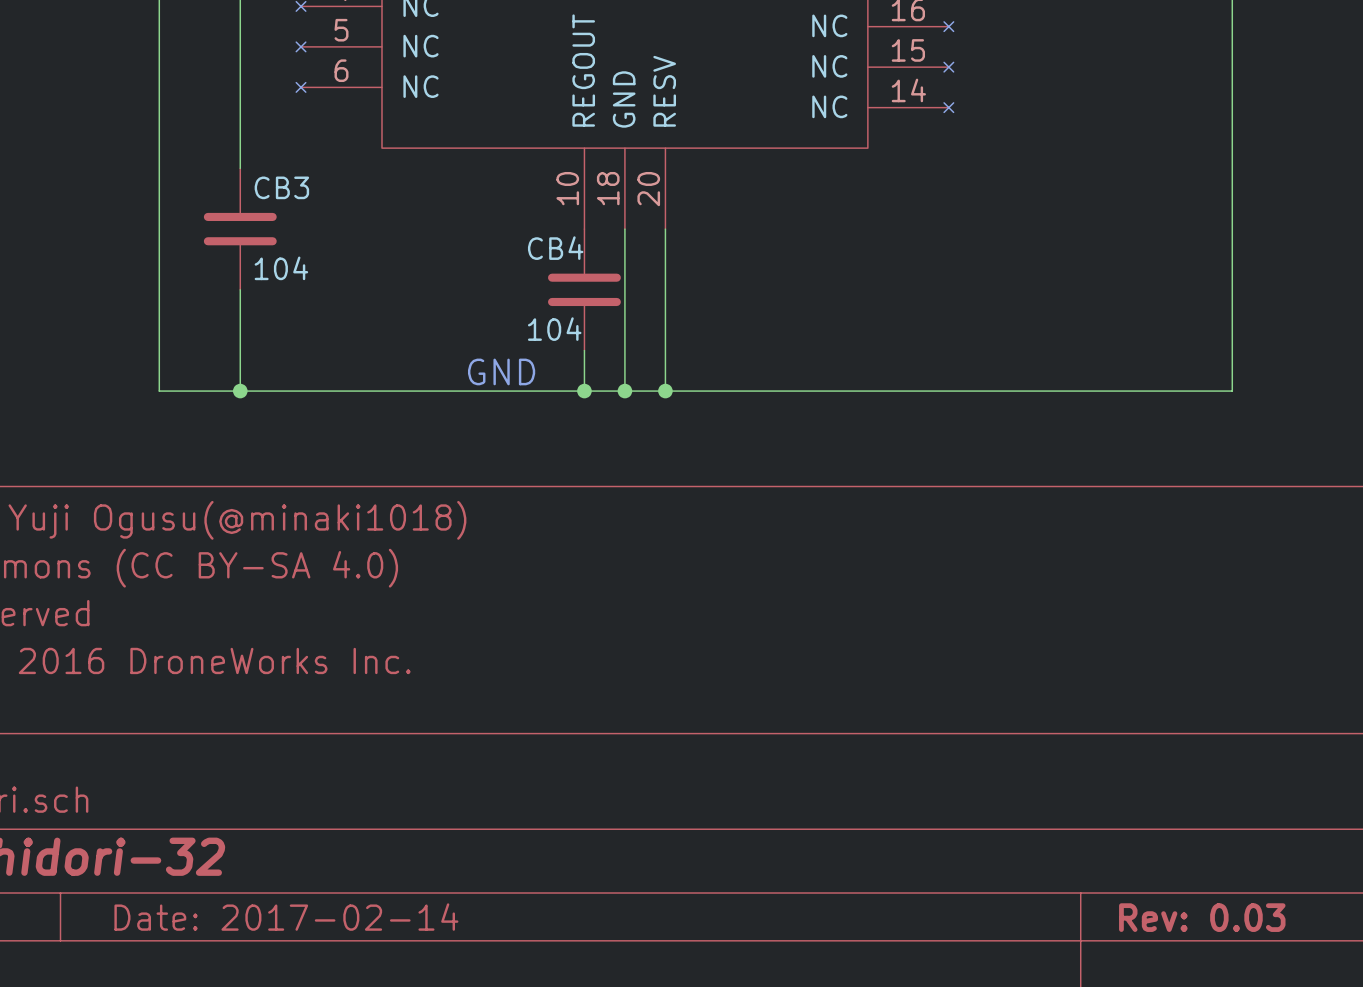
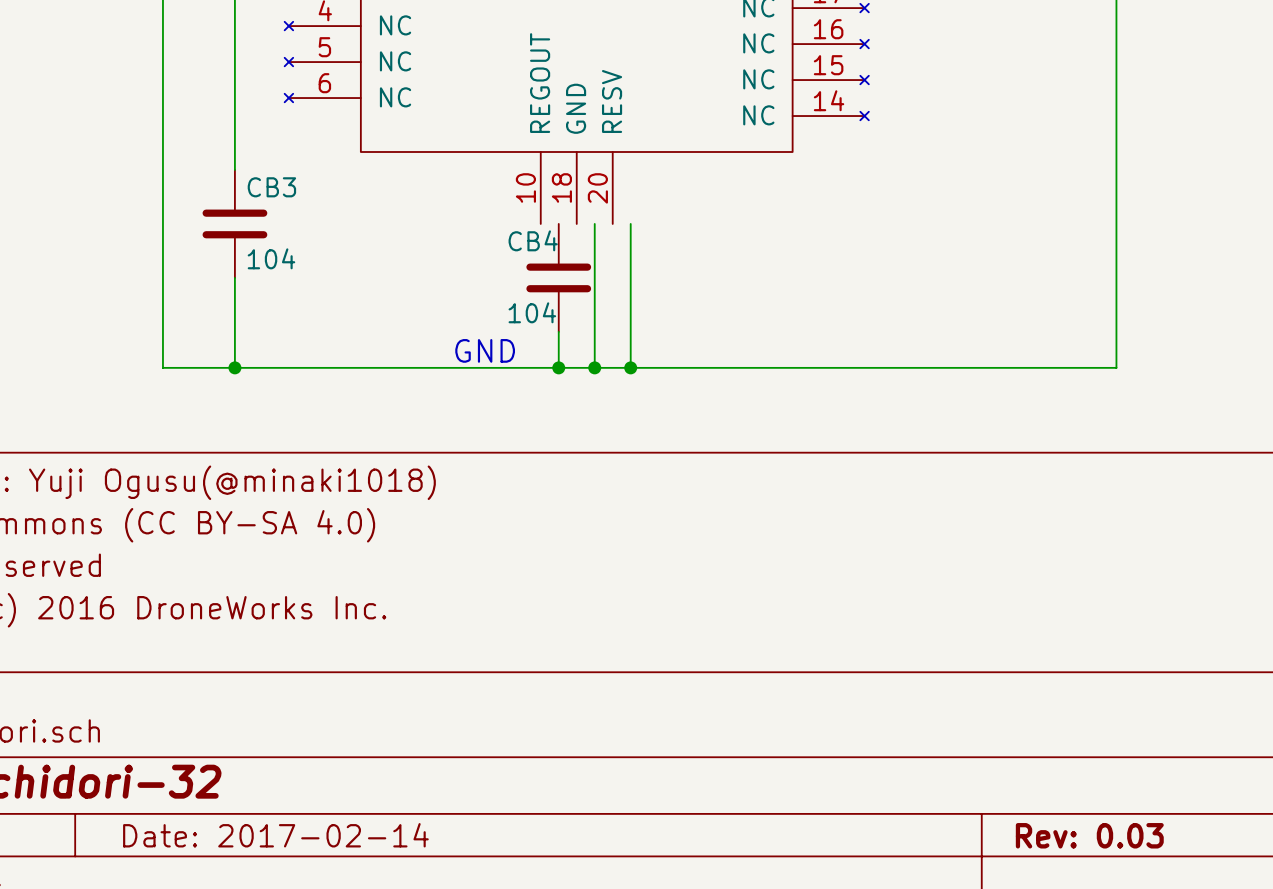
wire: (624, 229) (624, 391) -> (594, 223) (594, 367)
wire: (665, 229) (665, 391) -> (630, 223) (630, 367)
CB4 position: (584, 289) -> (558, 277)
wire: (584, 350) (584, 391) -> (558, 331) (558, 367)
text position: GND (501, 371) -> GND (485, 350)
junction: (584, 391) -> none
junction: none -> (558, 367)
junction: (624, 391) -> none
junction: none -> (594, 367)
junction: (665, 391) -> none
junction: none -> (630, 367)

